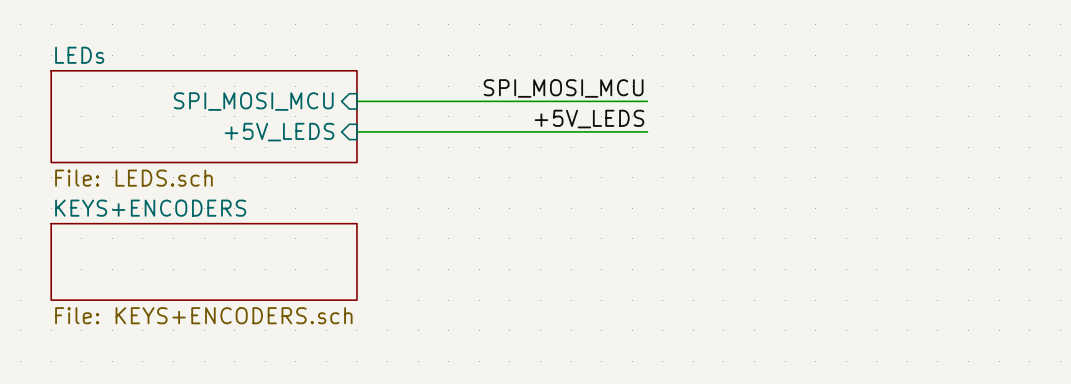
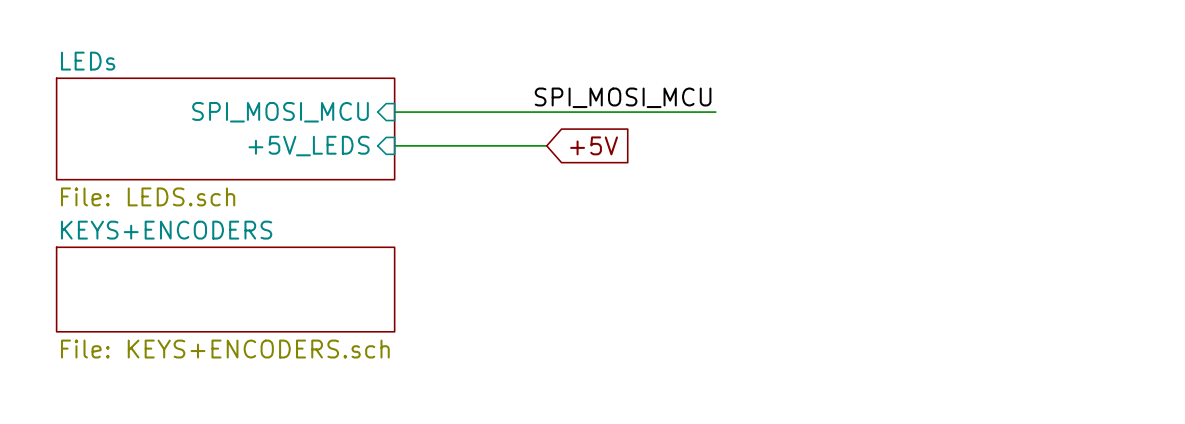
label: +5V_LEDS (589, 119) -> none
wire: (494, 131) (647, 131) -> none
global label: none -> +5V (594, 145)

